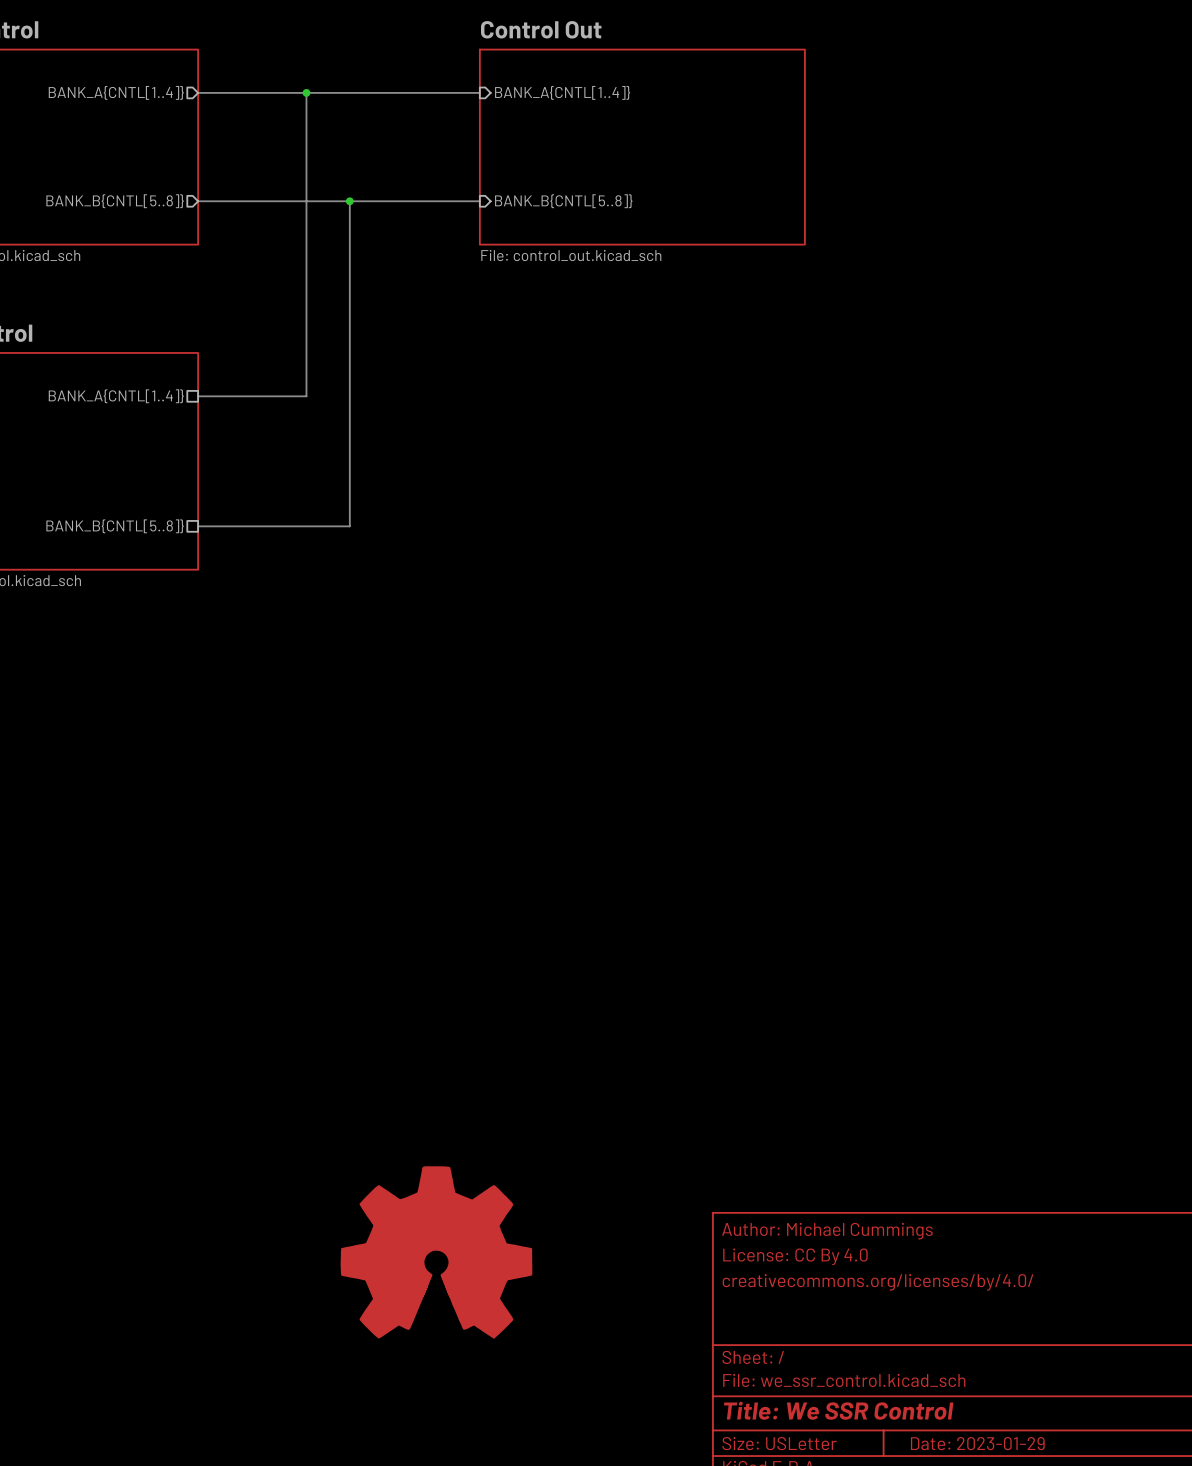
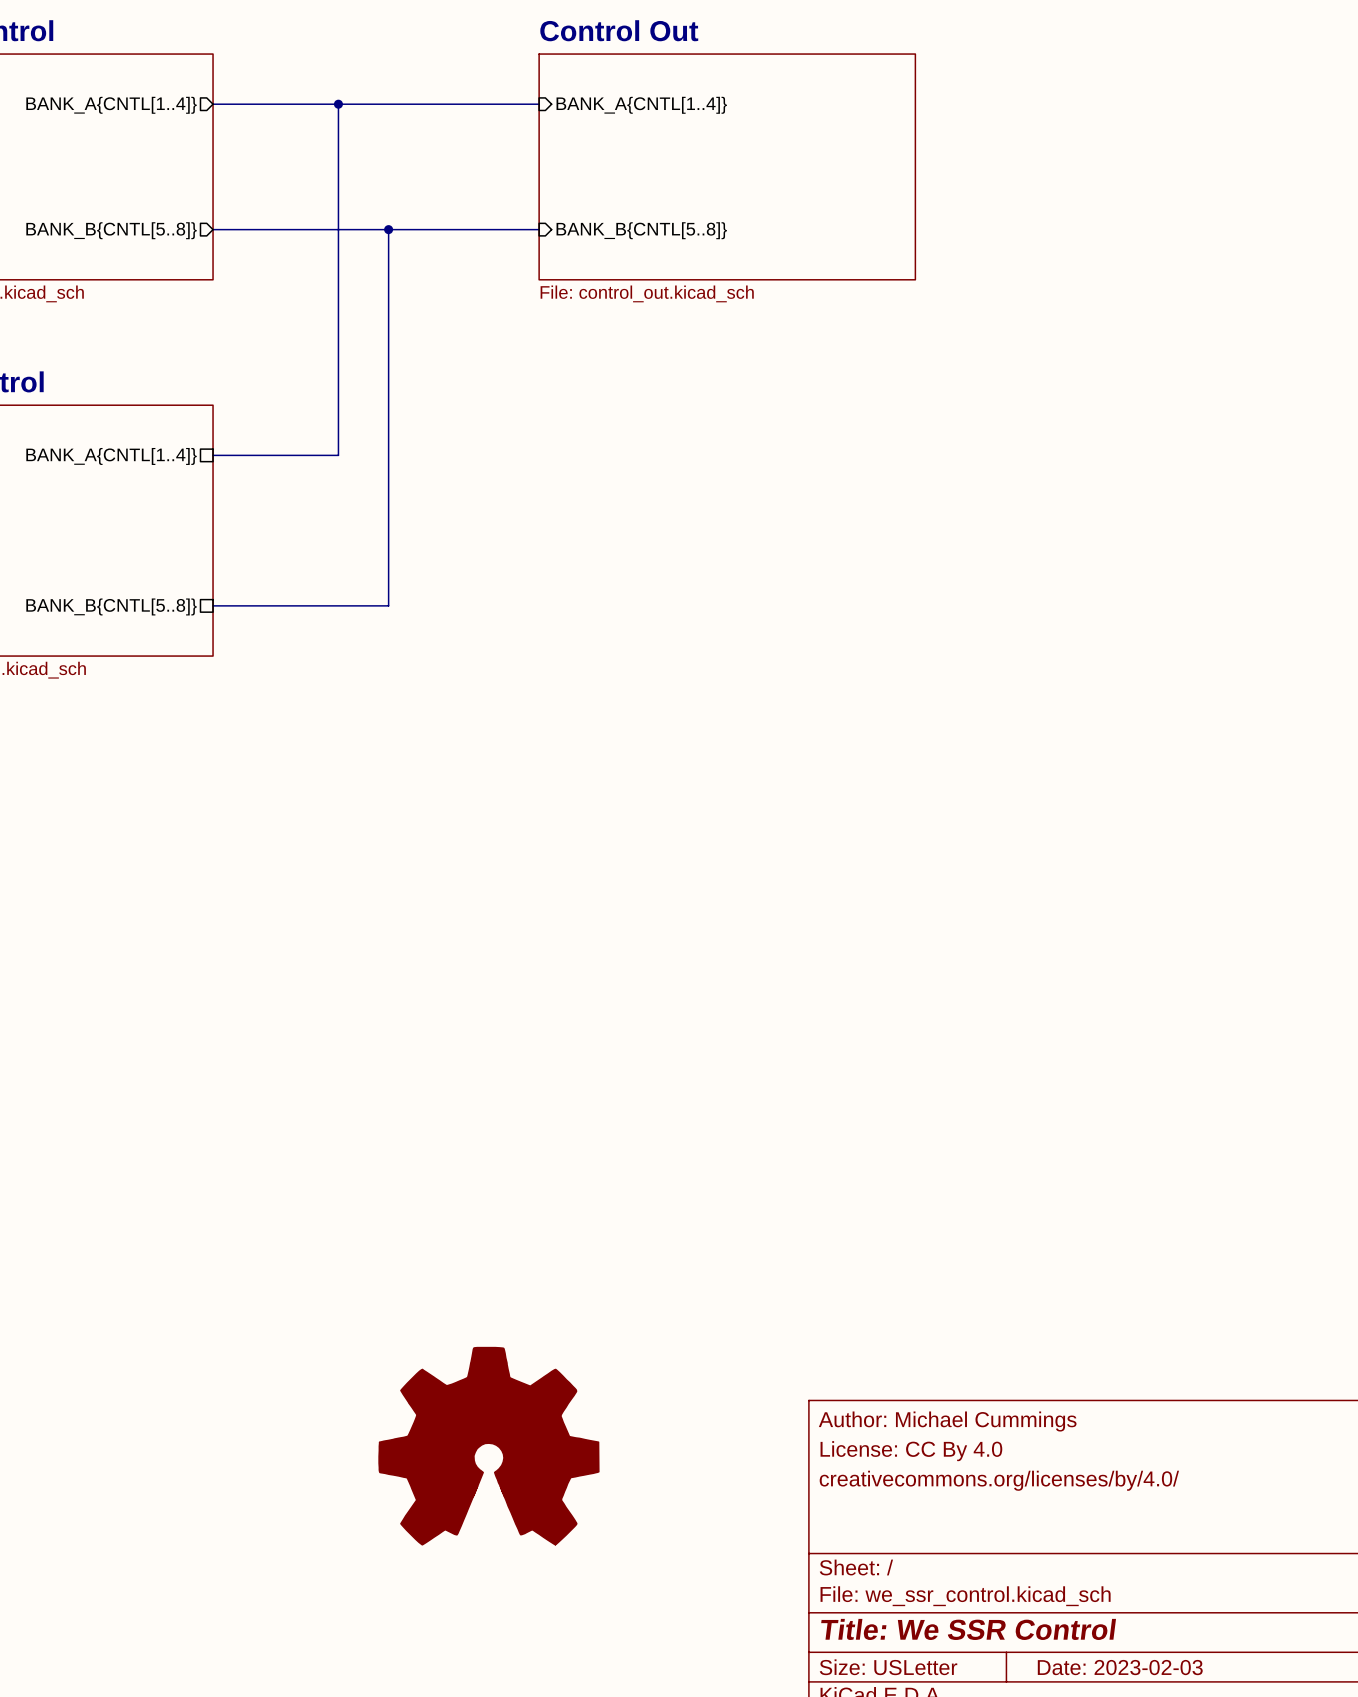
title block: Date: 2023-01-29 (977, 1443) -> Date: 2023-02-03 (1120, 1667)

